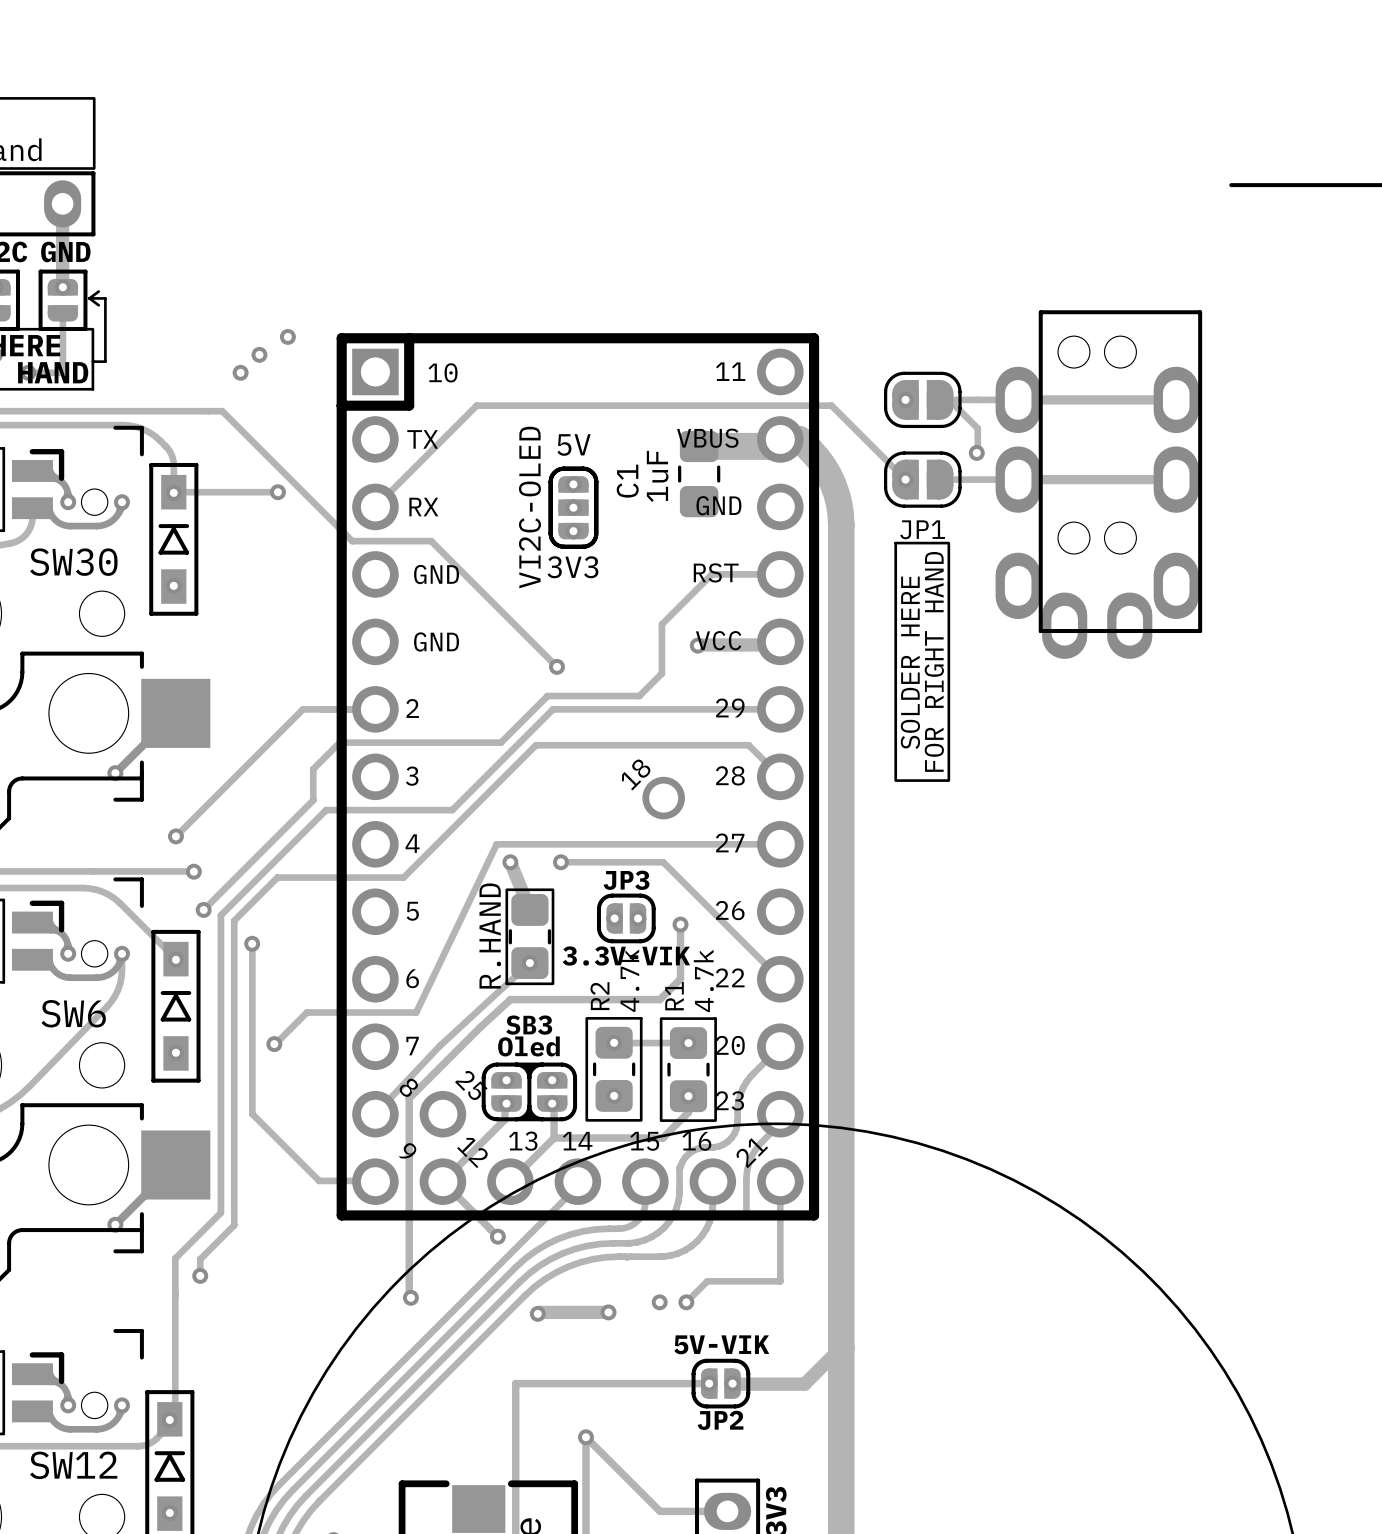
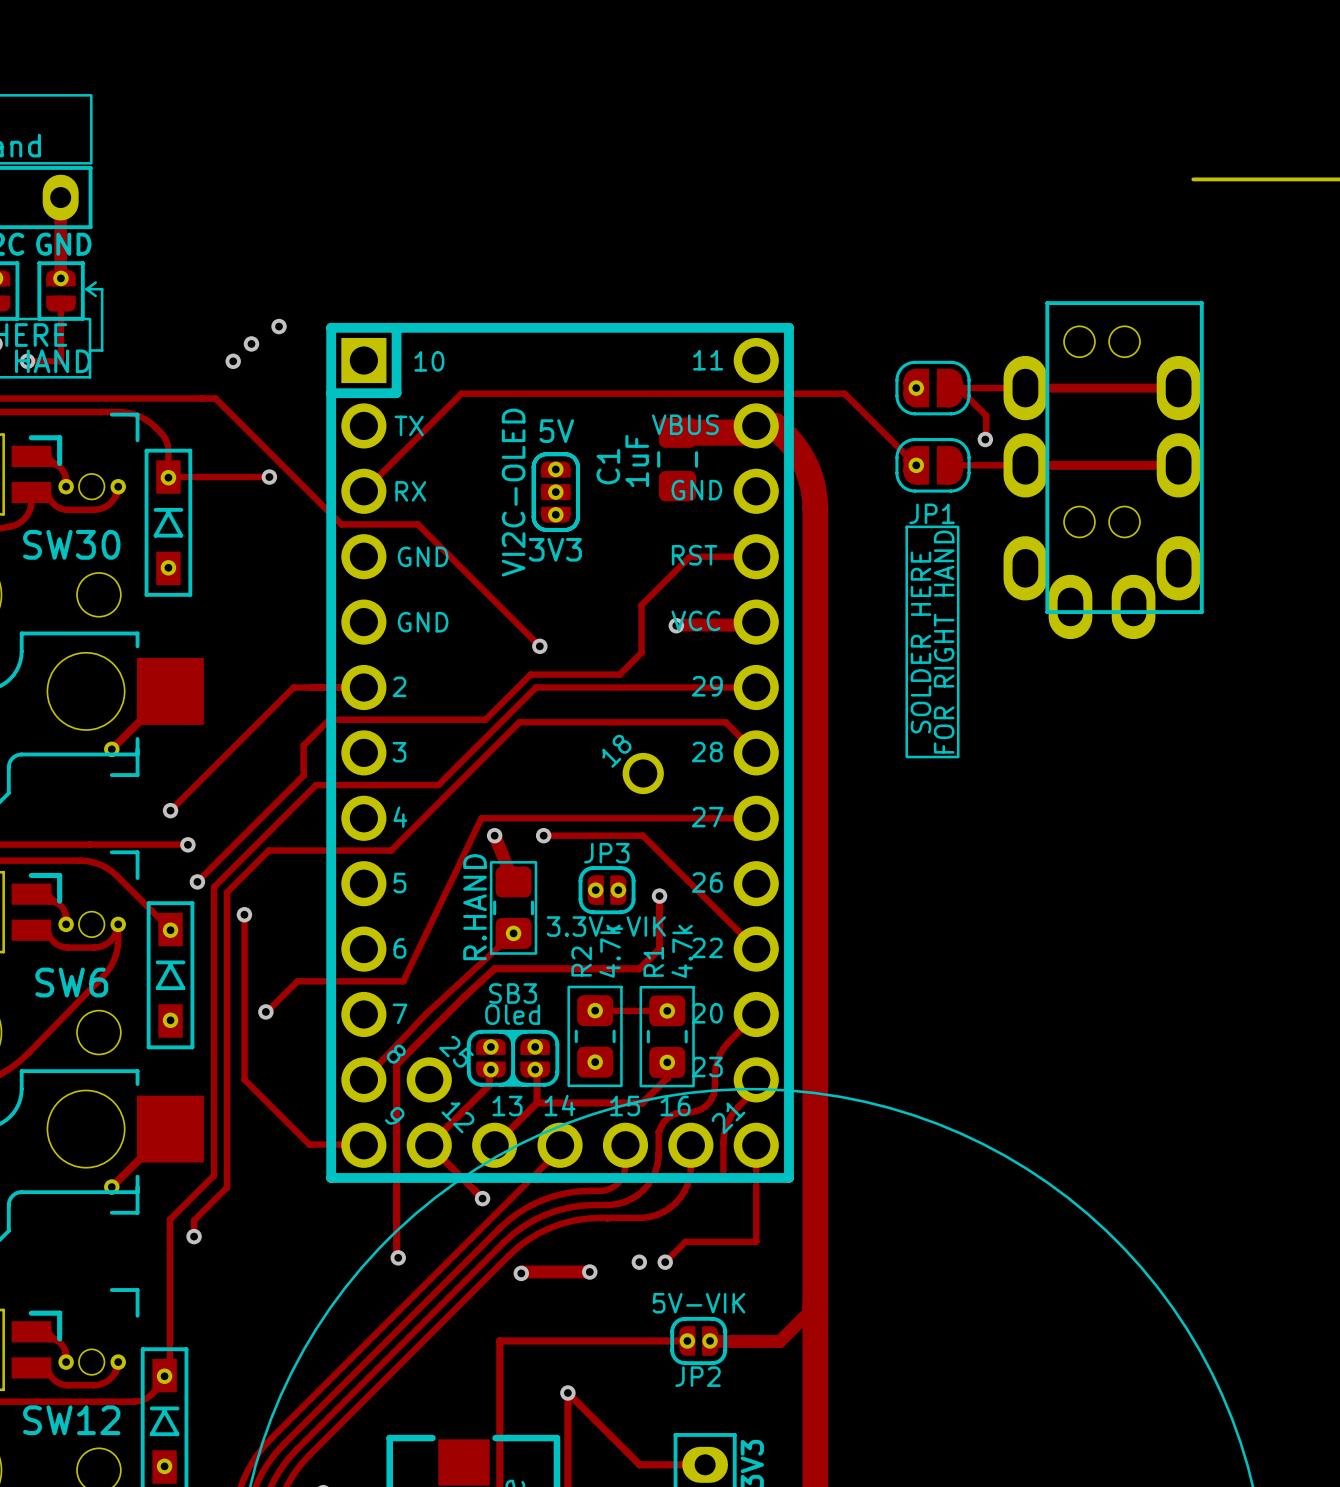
track: (940, 399) (1176, 399) -> (949, 388) (1178, 388)
track: (949, 399) (977, 428) (976, 452) -> (958, 388) (986, 415) (985, 439)
track: (476, 406) (831, 405) (905, 479) -> (461, 393) (844, 393) (916, 465)
via position: (976, 452) -> (985, 439)
track: (940, 479) (1176, 479) -> (949, 465) (1178, 465)
part position: (1098, 484) -> (1103, 470)
JP1 position: (922, 576) -> (933, 559)

